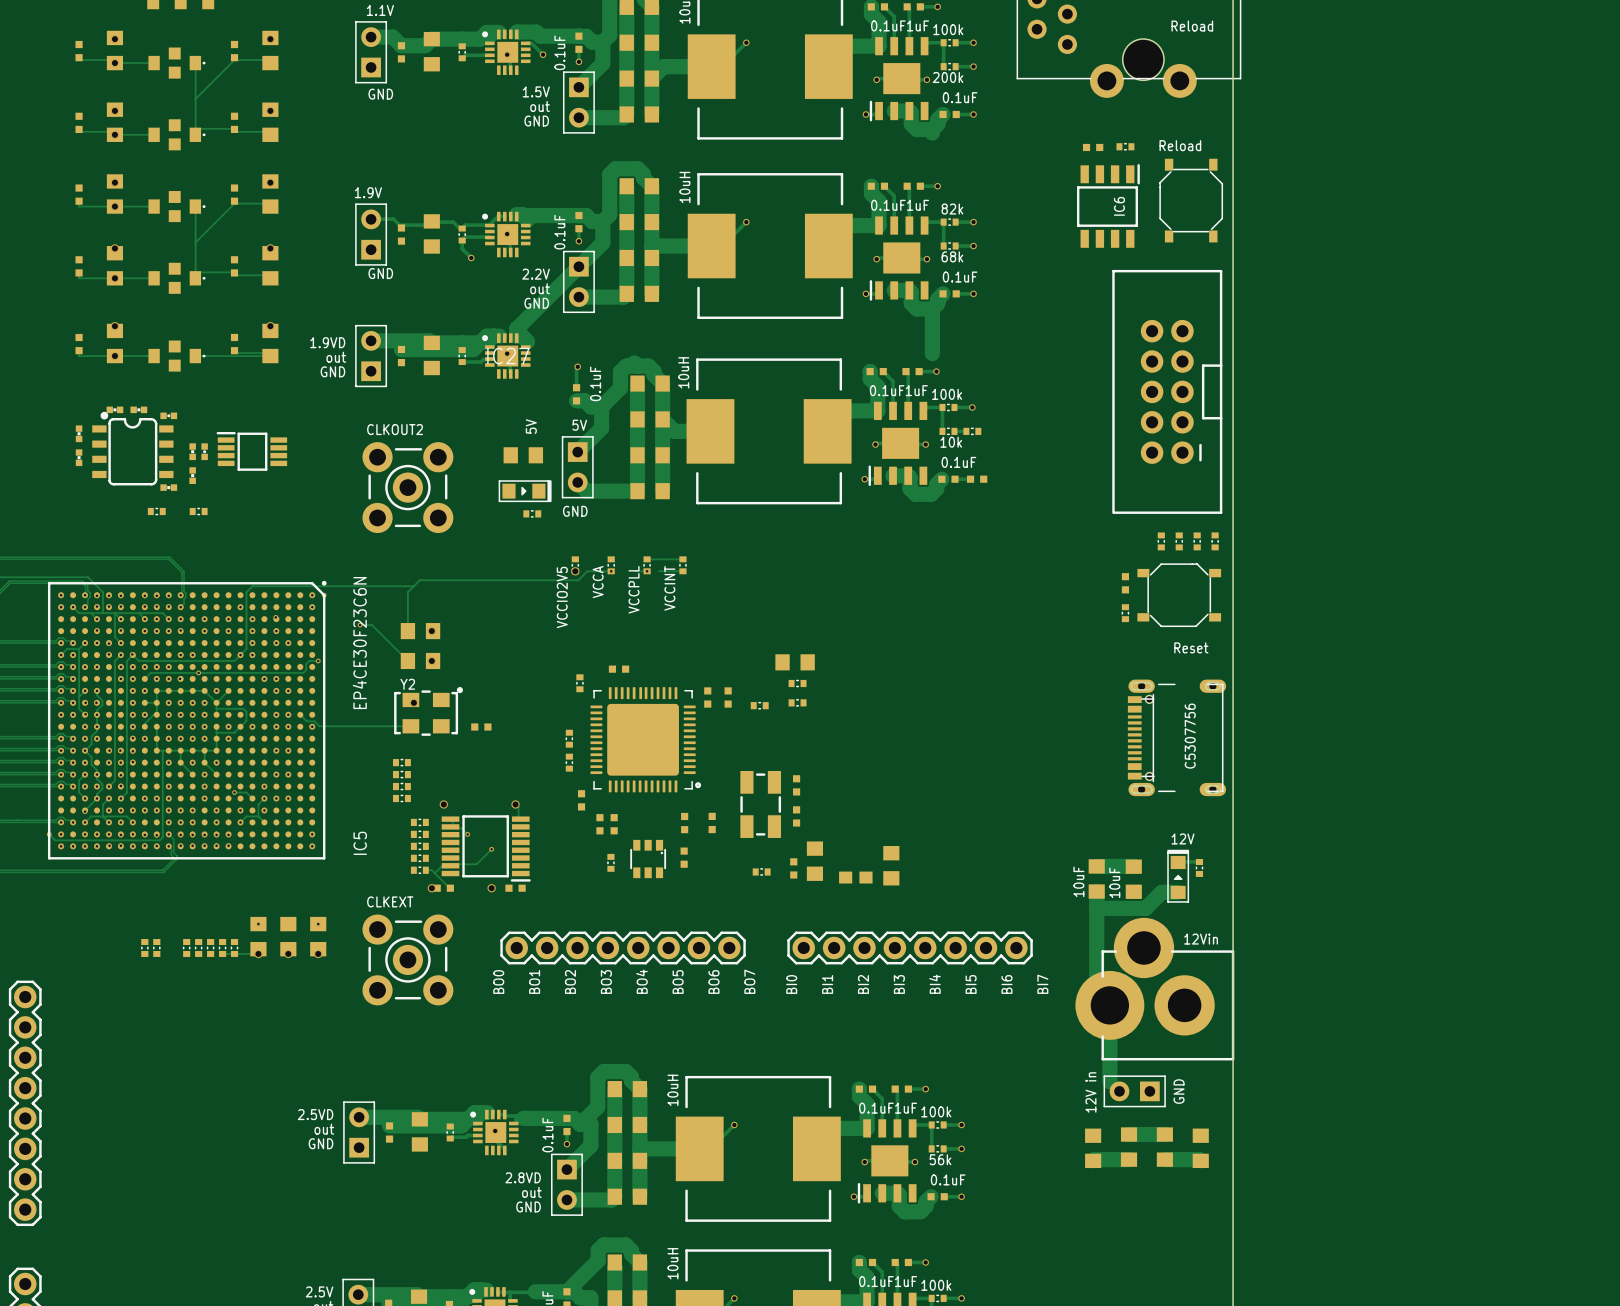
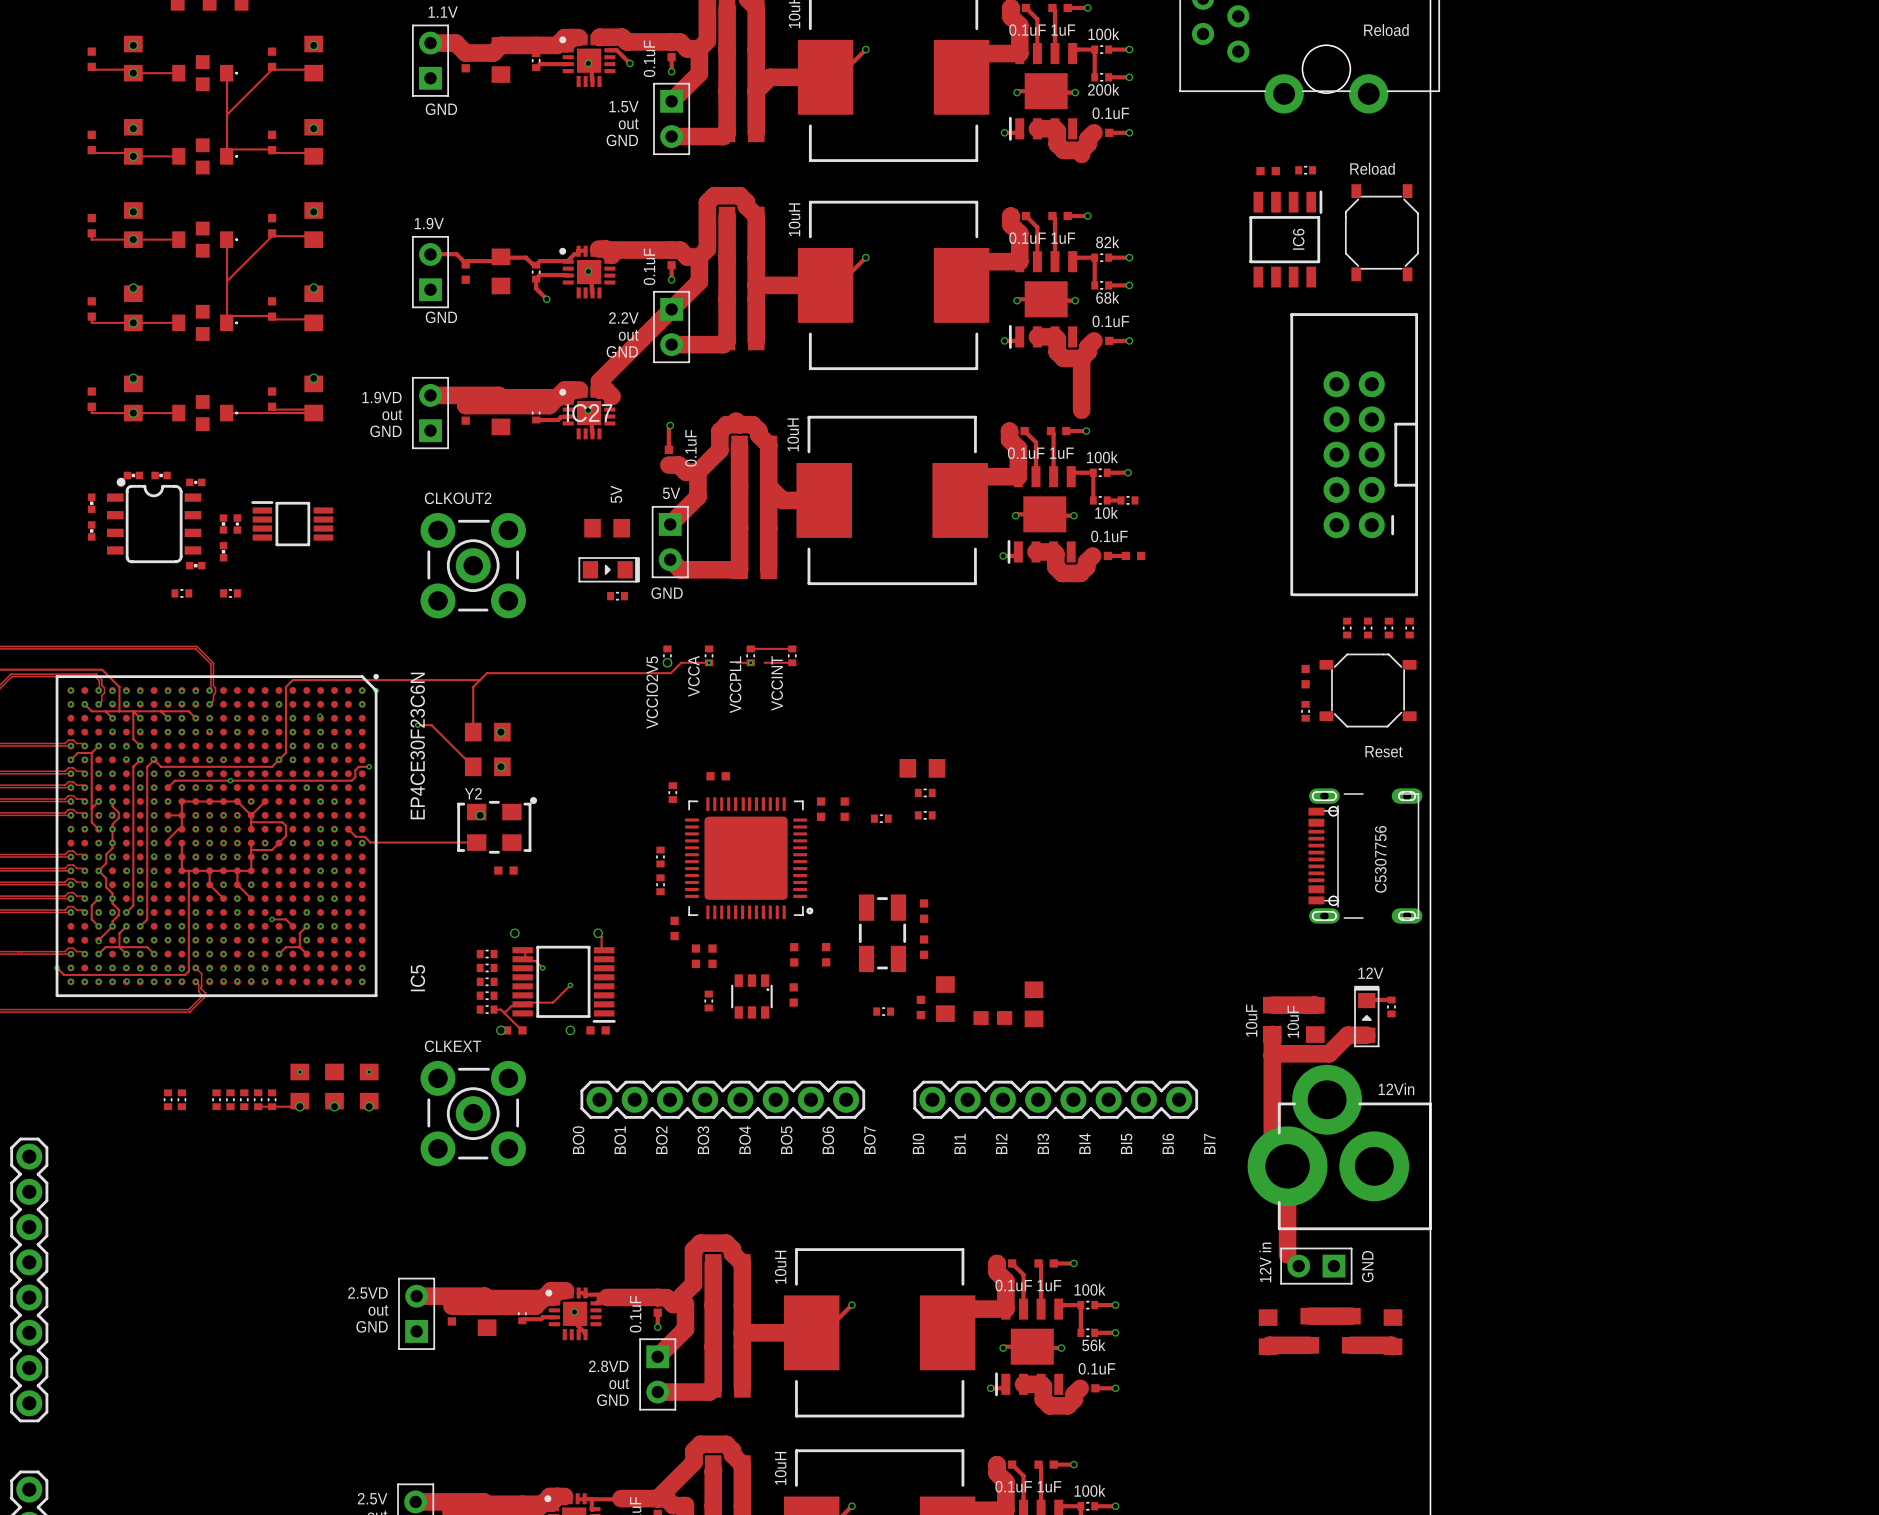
part position: (481, 726) -> (505, 870)
part: (401, 762) -> none
part: (401, 774) -> none
part: (401, 786) -> none
part: (401, 798) -> none

